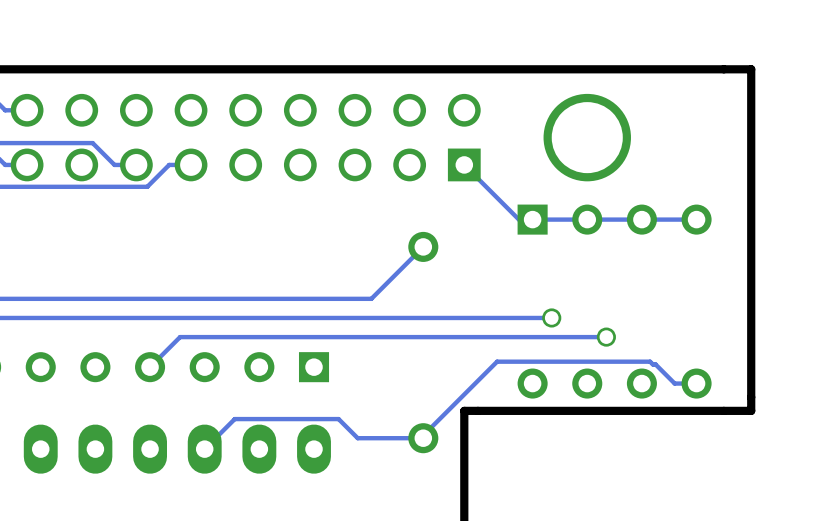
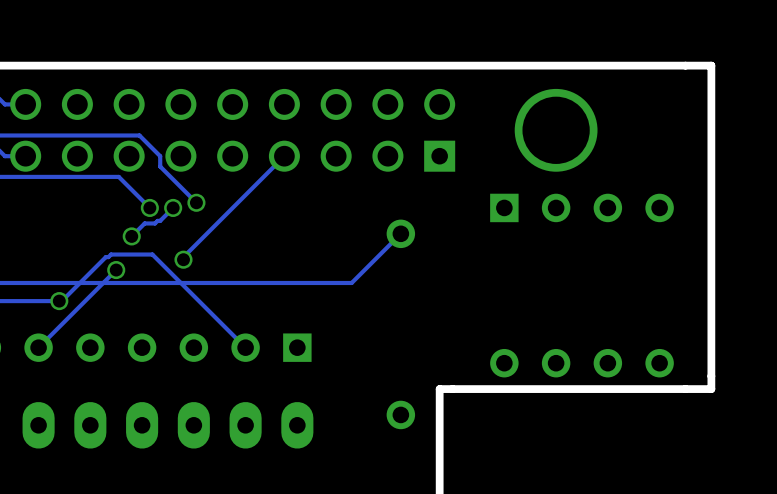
track: (92, 143) (114, 164) (136, 164) -> (87, 135) (139, 135) (160, 156) (160, 166) (196, 202)
track: (182, 164) (169, 164) (147, 186) (125, 186) -> (149, 207) (118, 176)
track: none -> (284, 156) (183, 257) (183, 259)
track: (464, 164) (518, 219) (696, 219) -> none
via: none -> (196, 202)
via: none -> (149, 207)
track: none -> (173, 207) (160, 220) (155, 223) (144, 223) (131, 236)
via: none -> (173, 207)
via: none -> (131, 236)
via: none -> (183, 259)
track: none -> (116, 270) (38, 347)
via: none -> (116, 270)
via: none -> (59, 301)
track: (551, 317) (65, 317) -> (245, 347) (152, 254) (111, 254) (105, 257) (61, 301)
via: (551, 317) -> none
track: (606, 337) (180, 337) (150, 367) -> none
via: (606, 337) -> none
track: (696, 383) (674, 383) (655, 364) (650, 361) (497, 361) (423, 435) (423, 438) (357, 438) (338, 419) (234, 419) (204, 449) -> none

